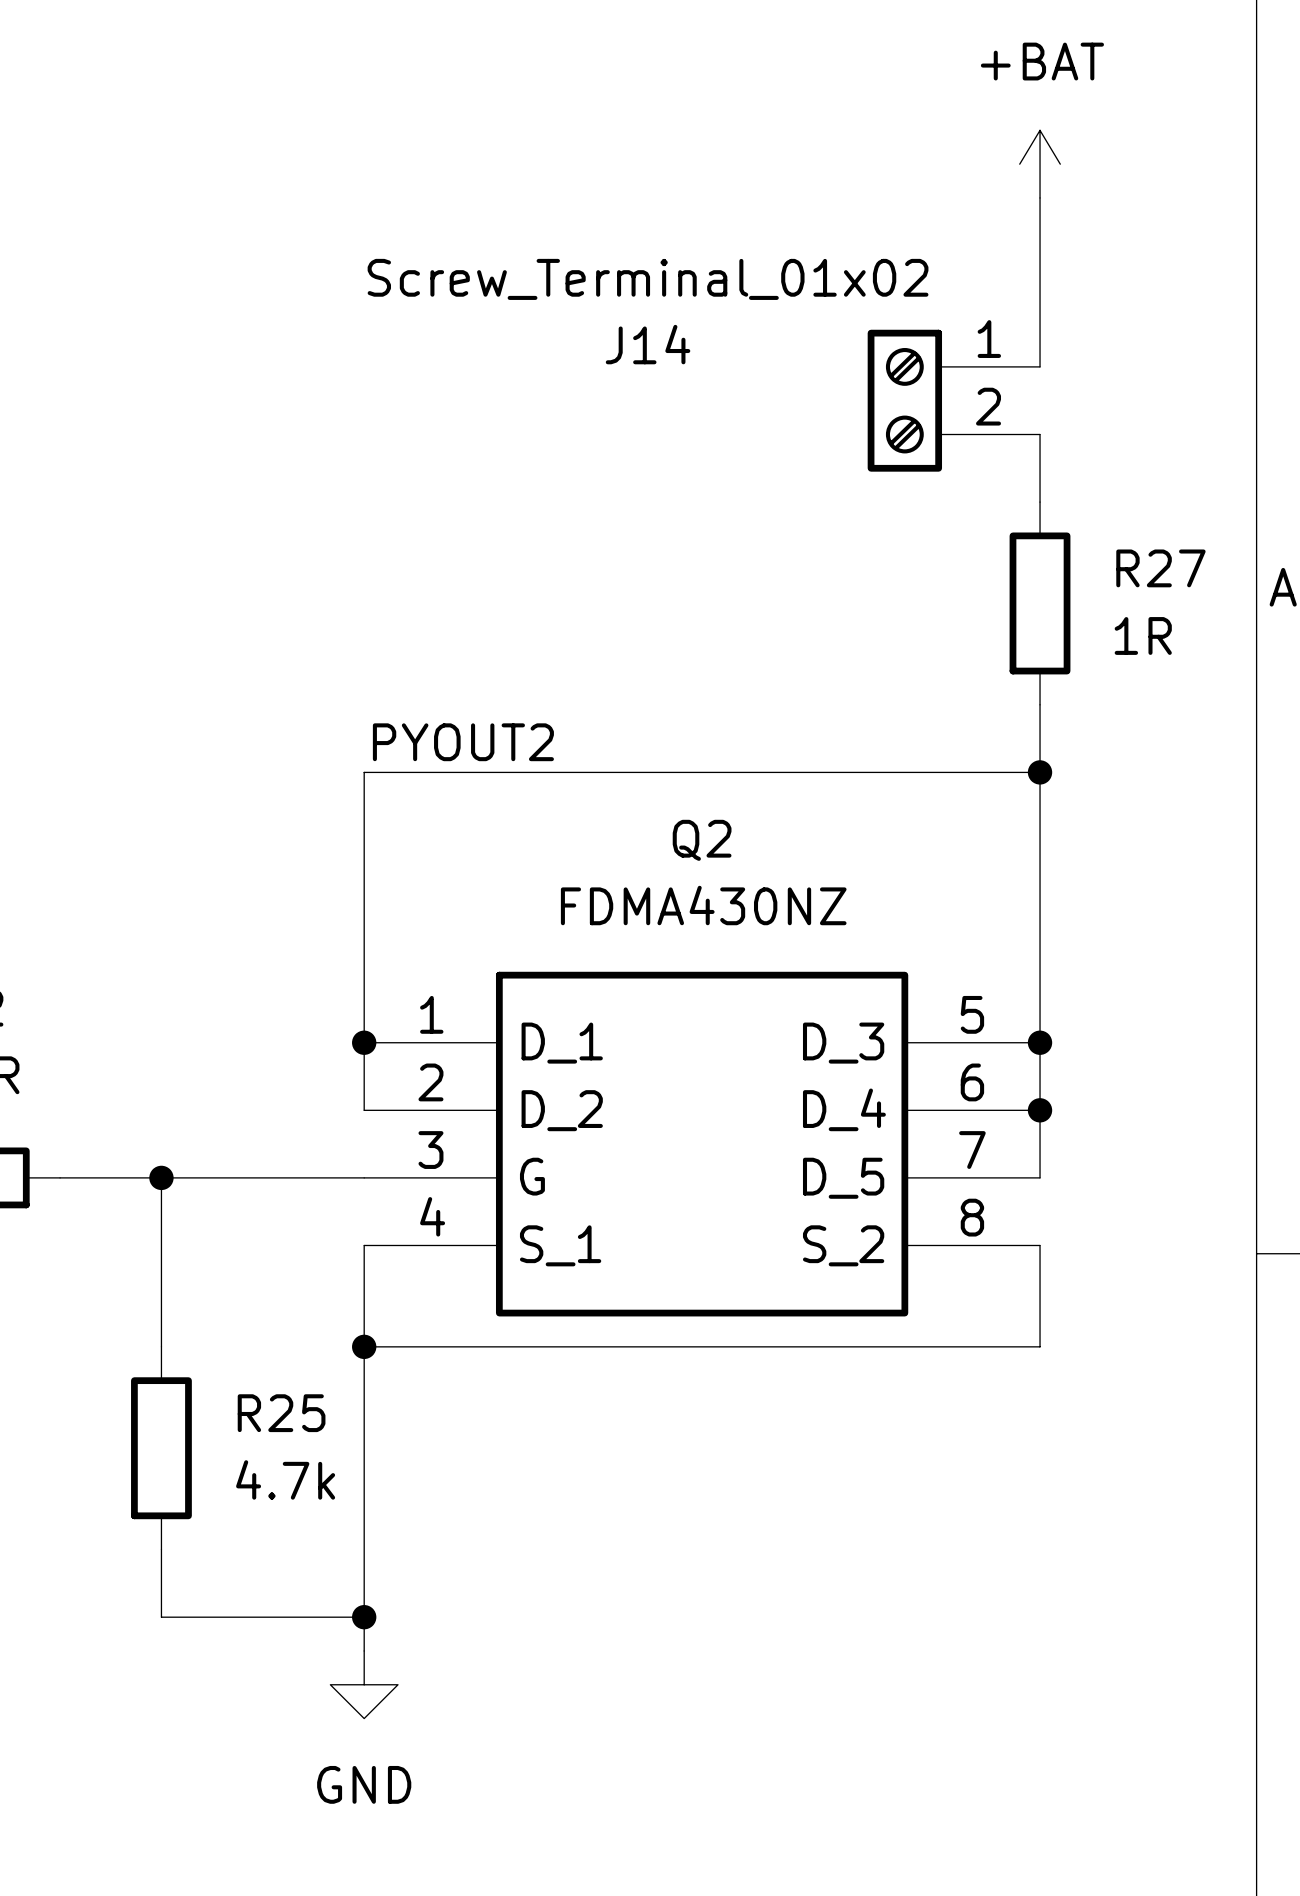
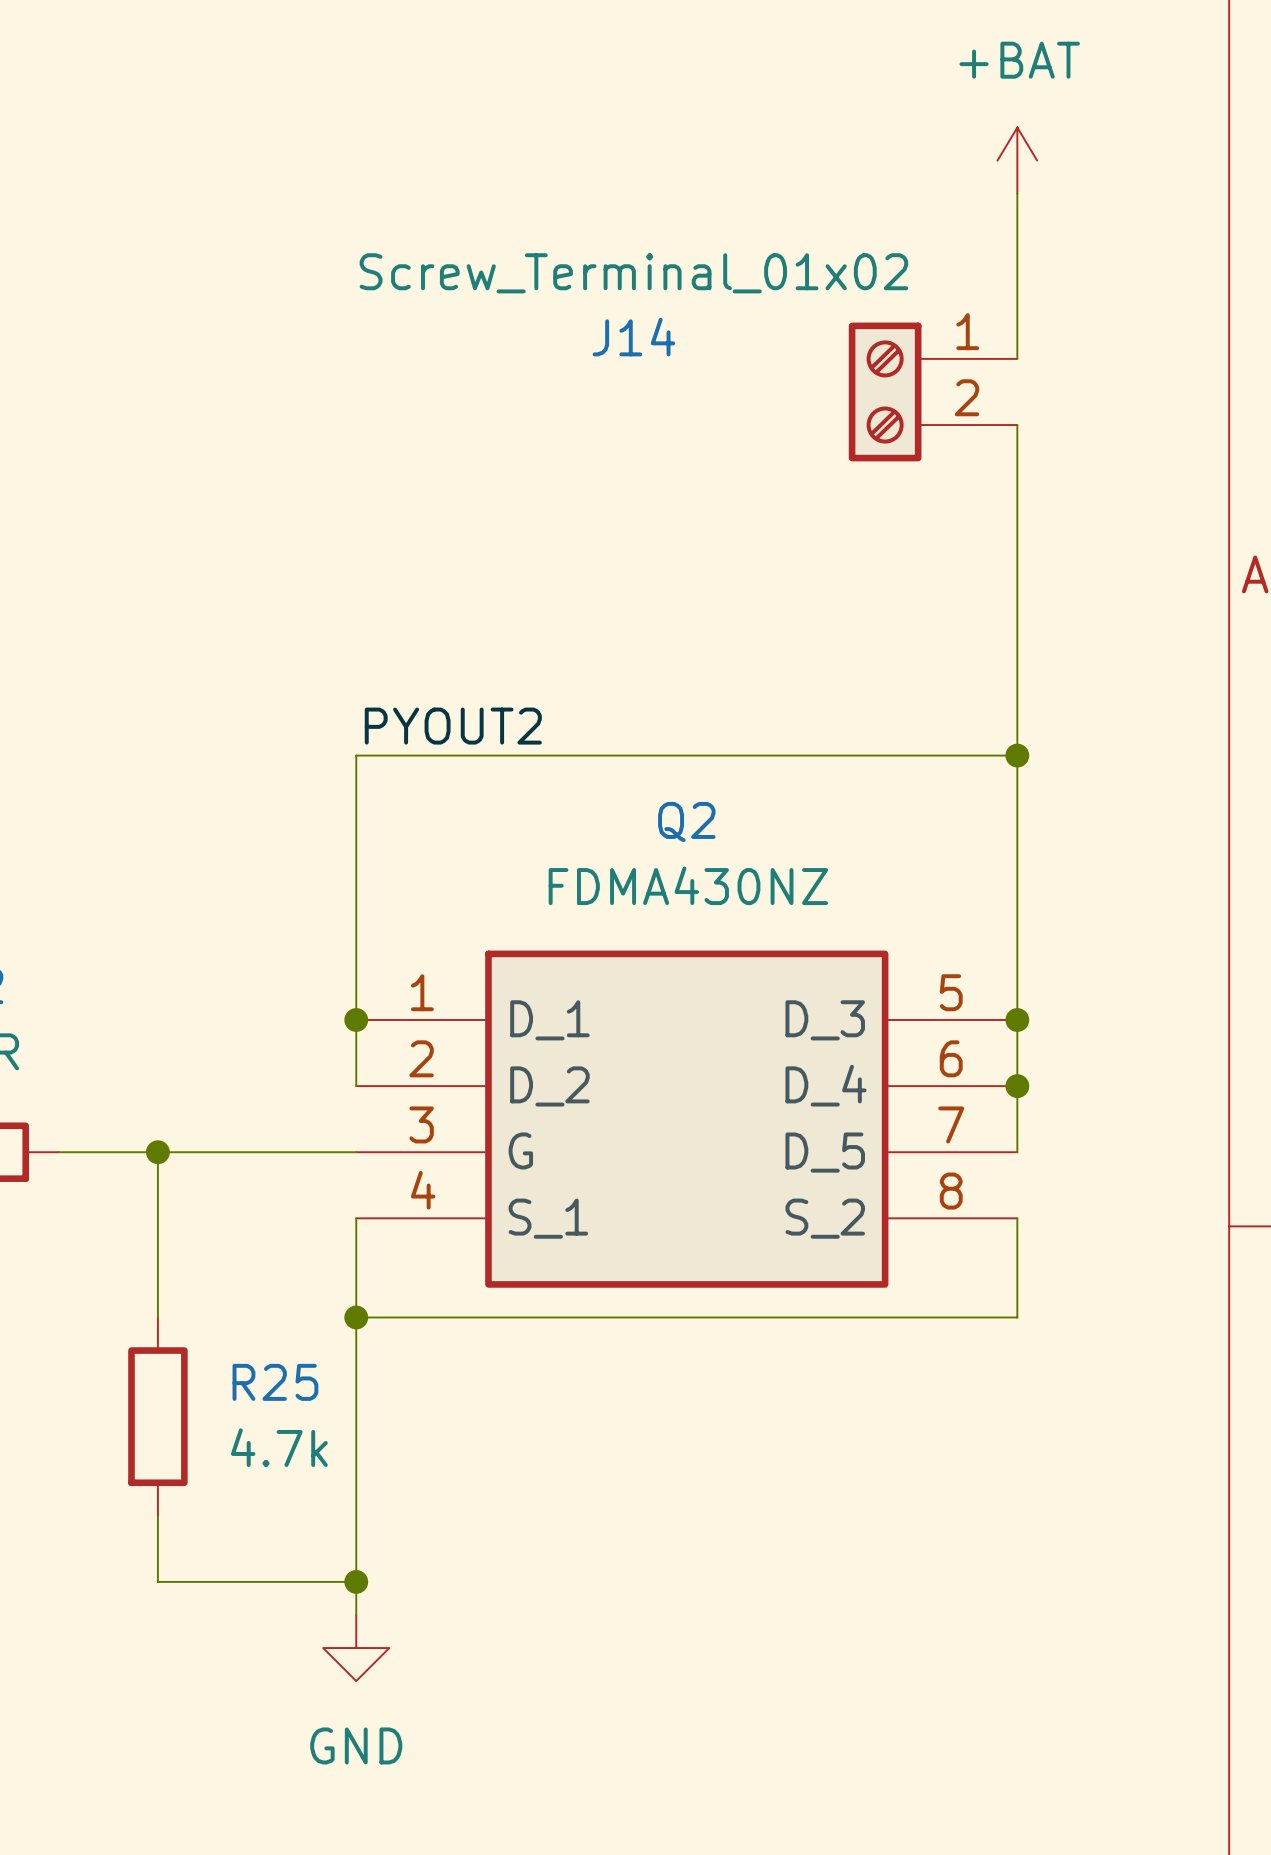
wire: none -> (1017, 491) (1017, 689)
R27: 1R (1040, 603) -> none

